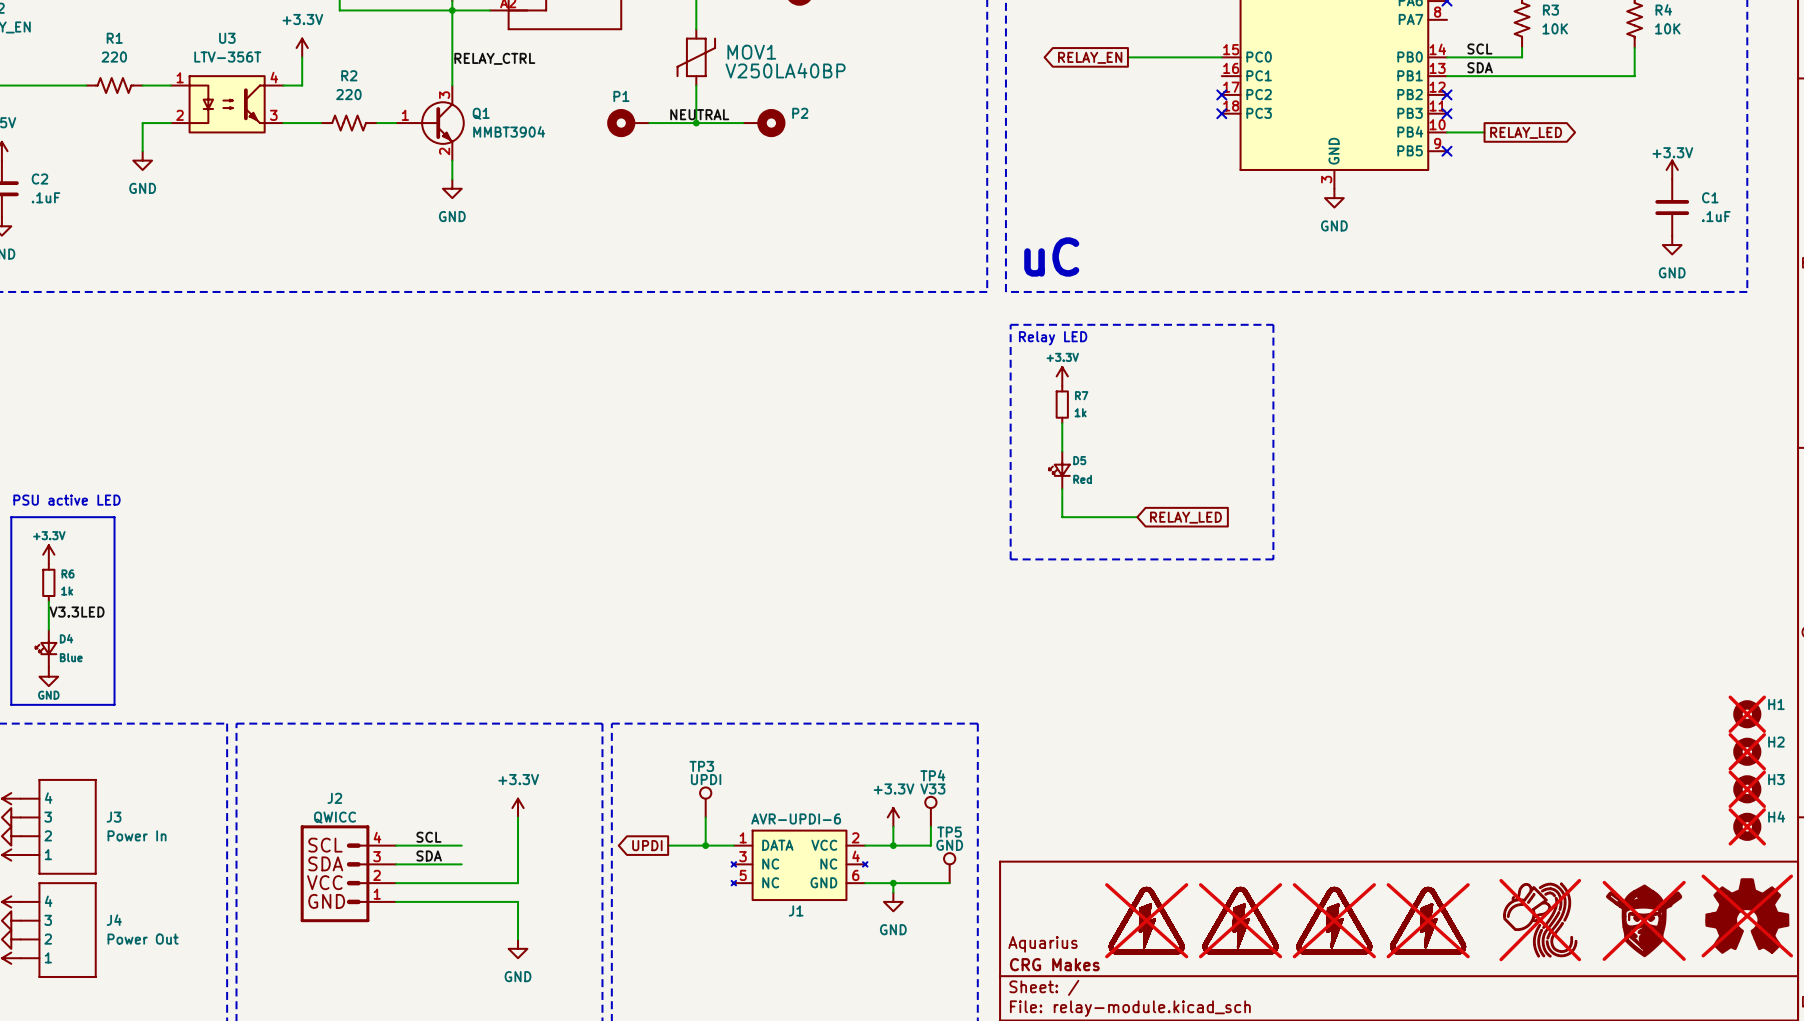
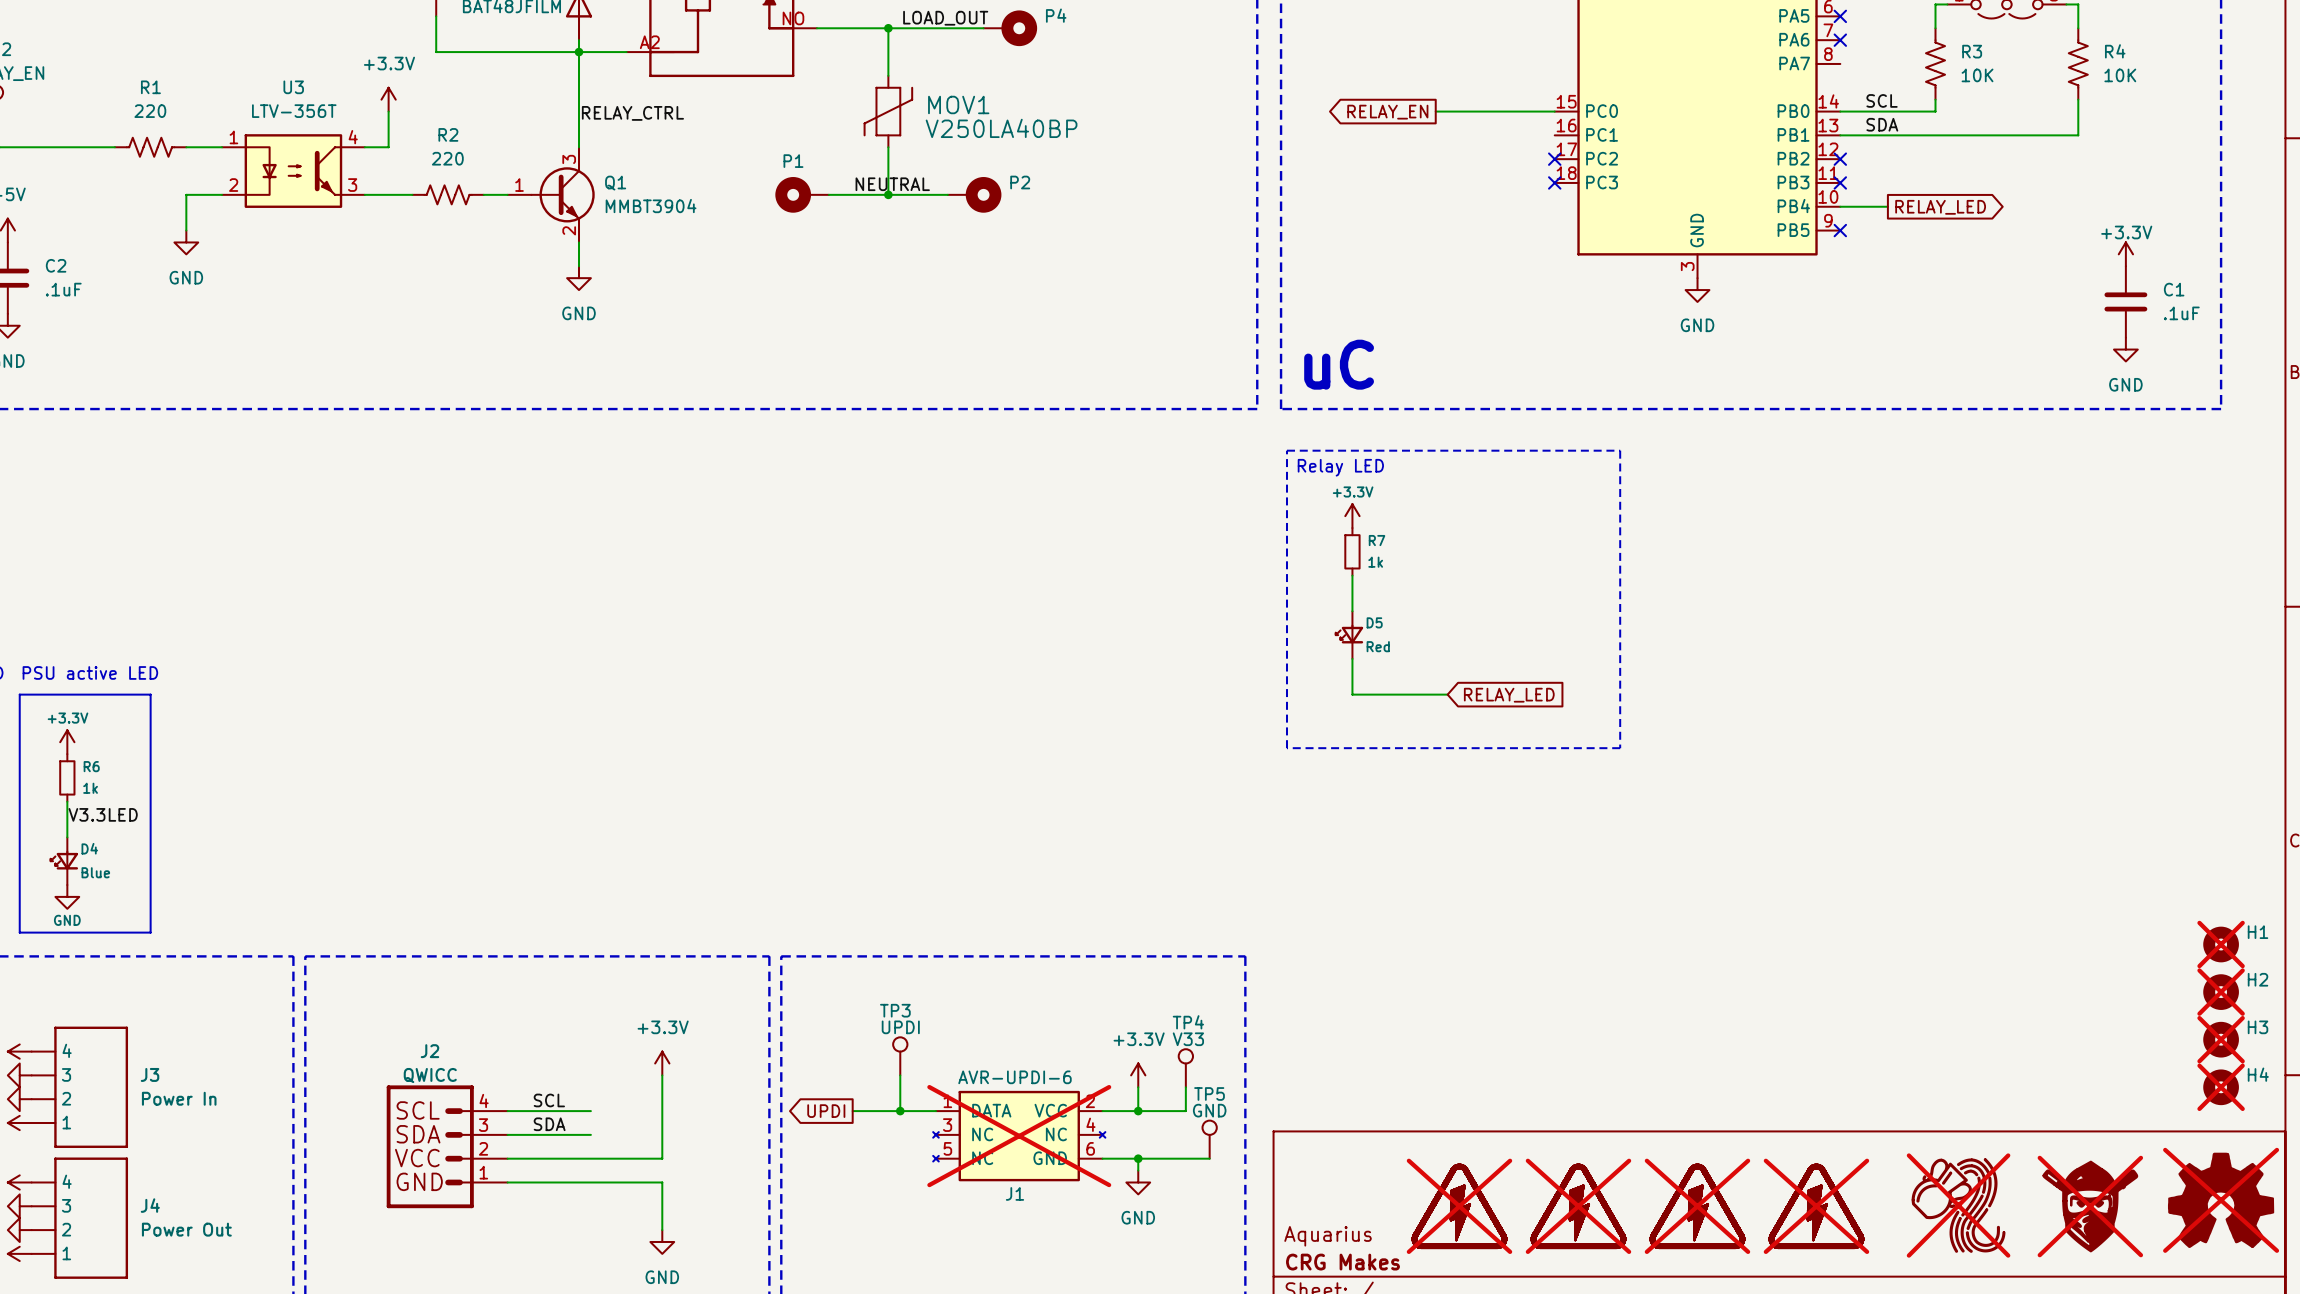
J1 do-not-place cross: none -> (1019, 1136)

